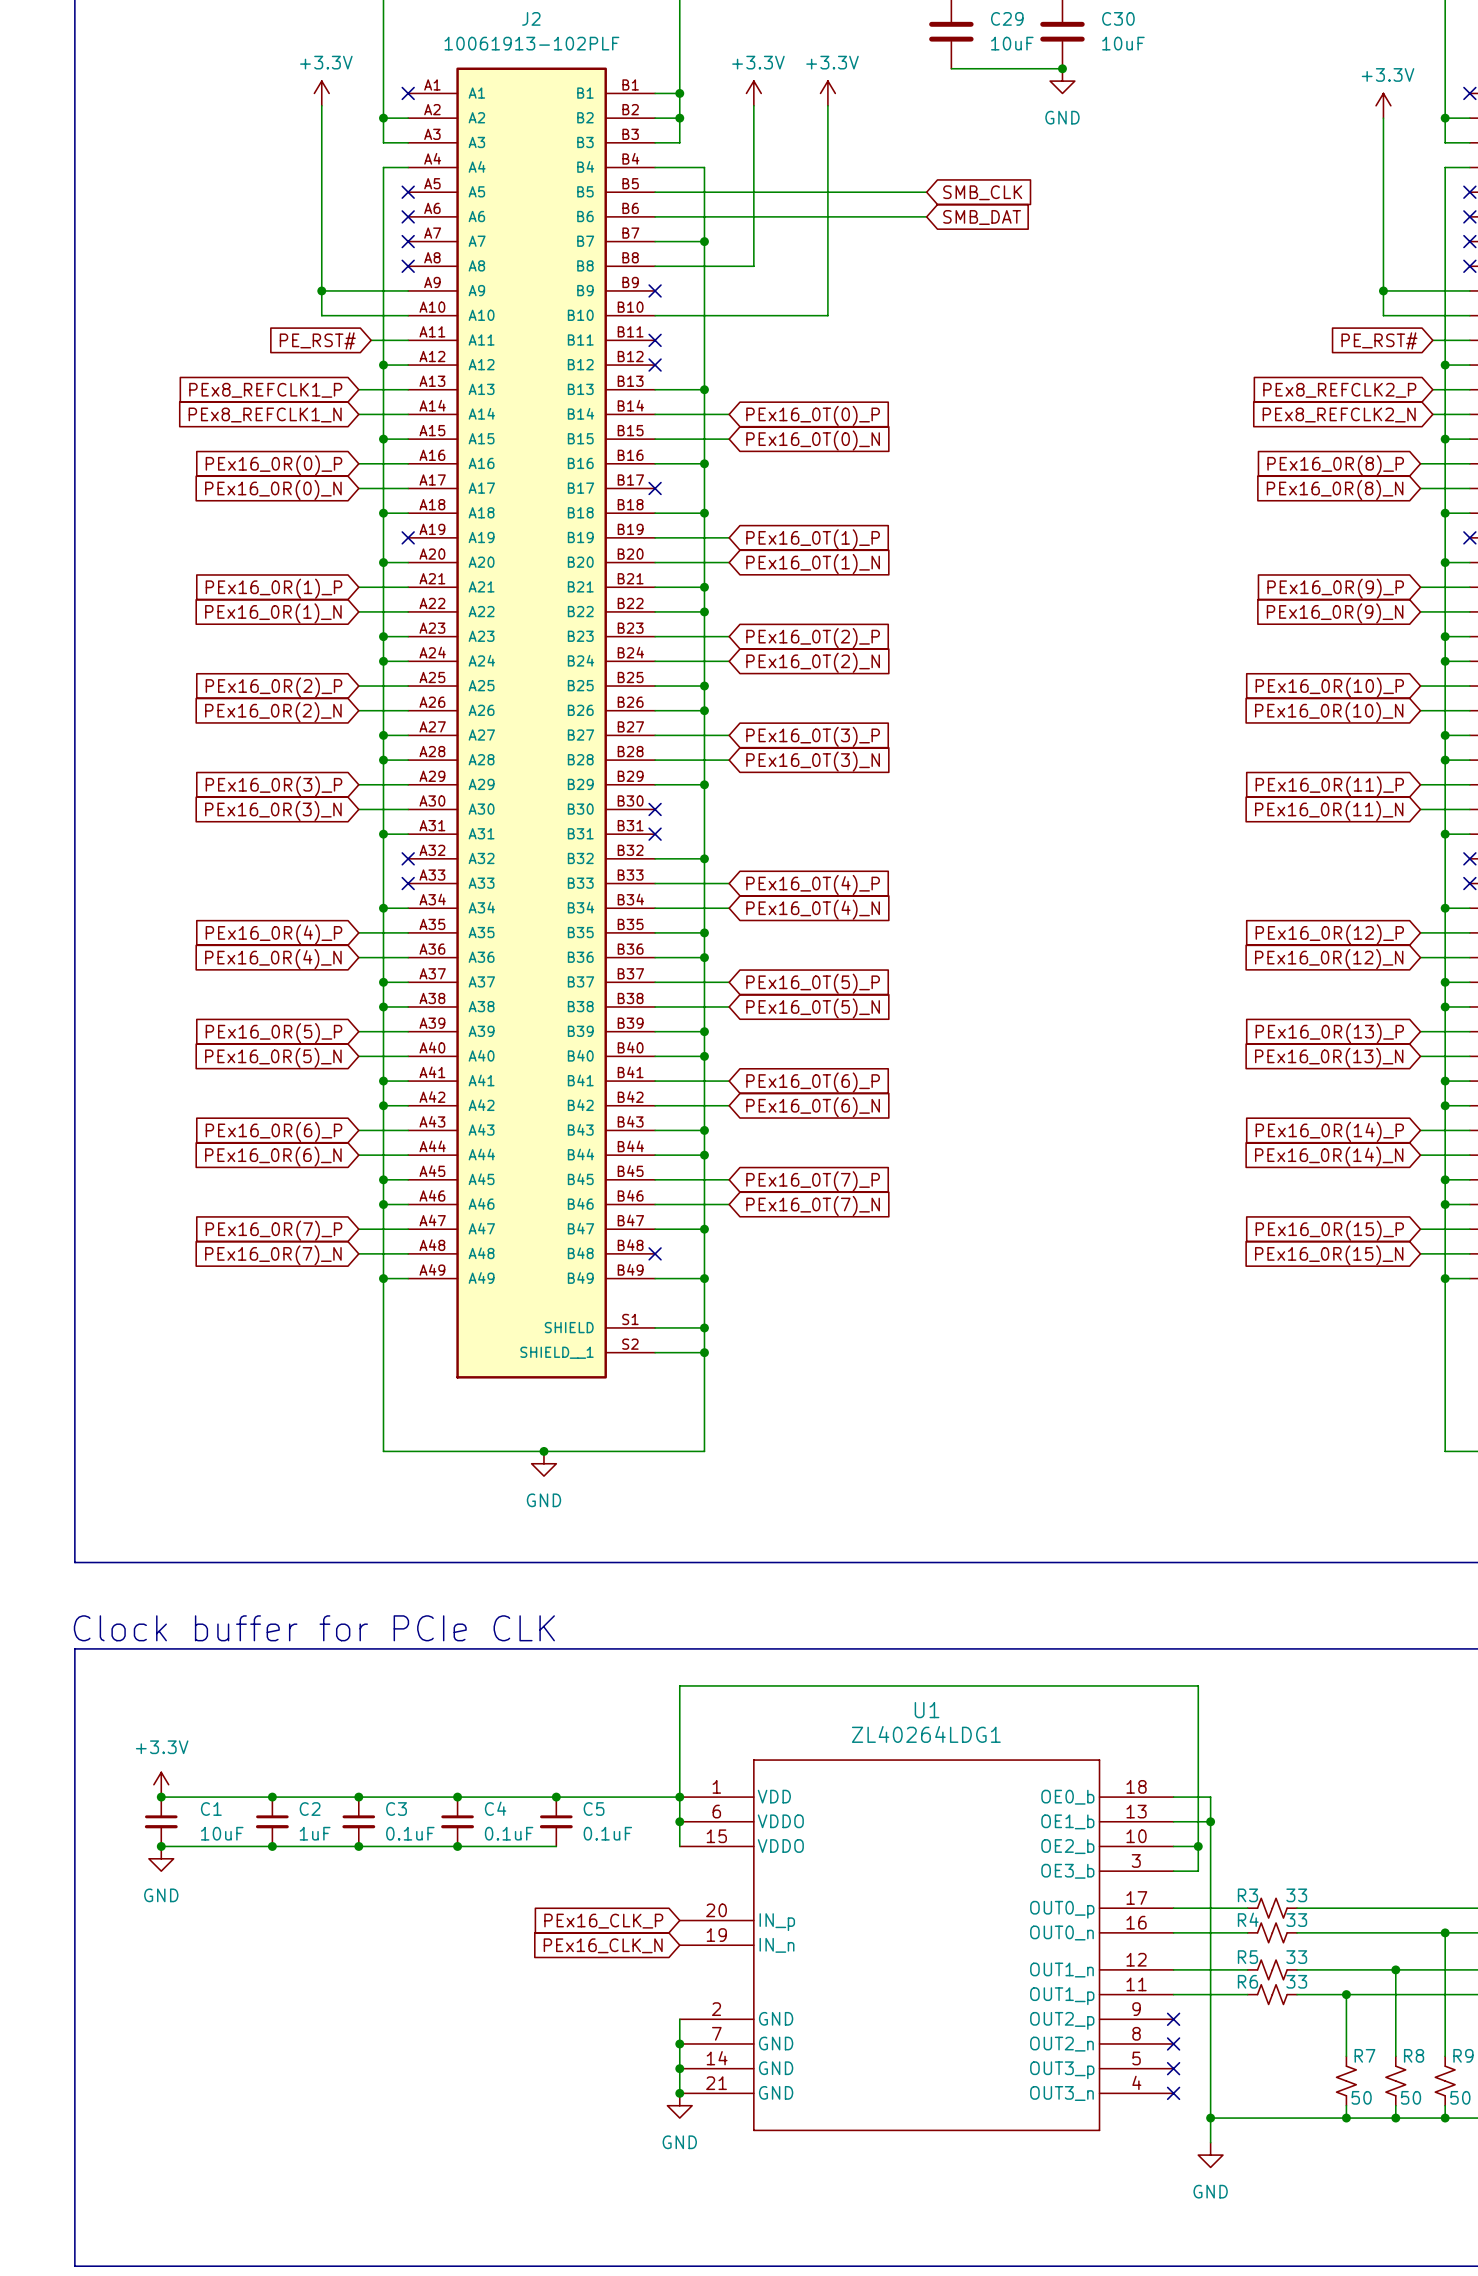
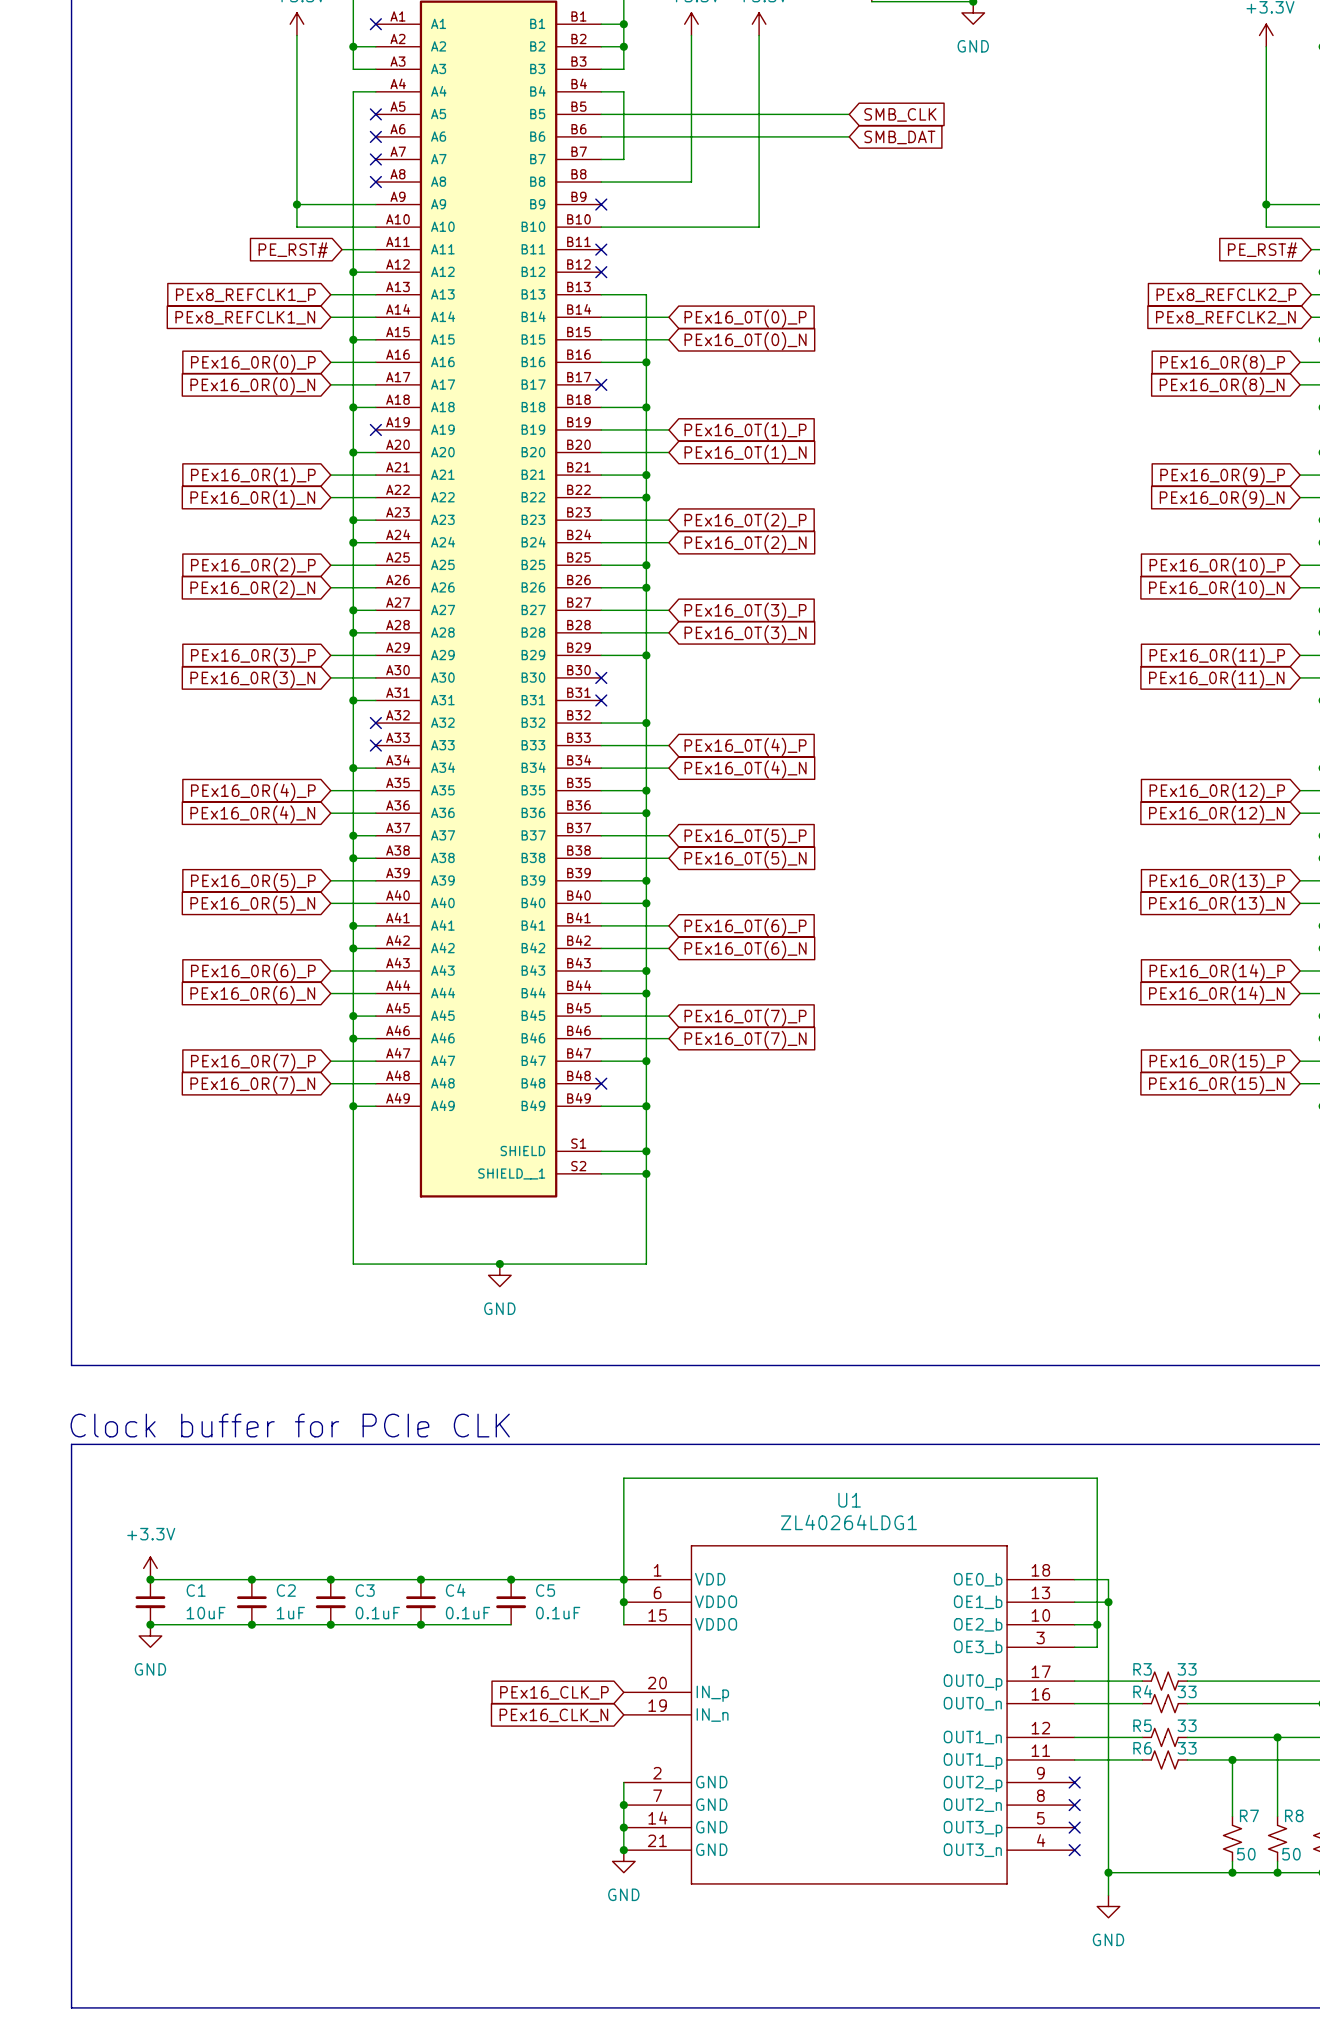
wire: (679, 167) (704, 167) (704, 389) -> none
wire: (679, 241) (704, 241) -> (623, 159) (623, 91)
junction: (704, 241) -> none
junction: (704, 389) -> none

